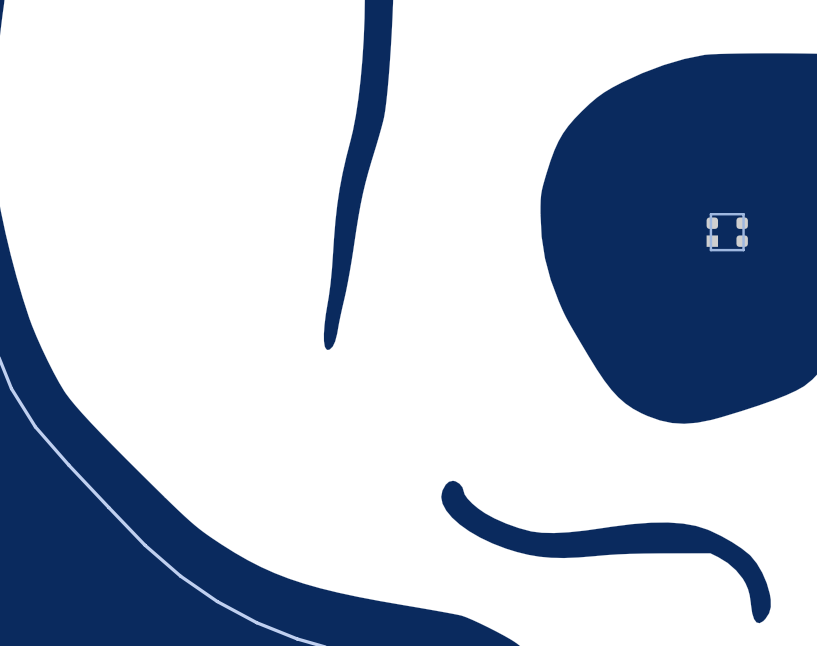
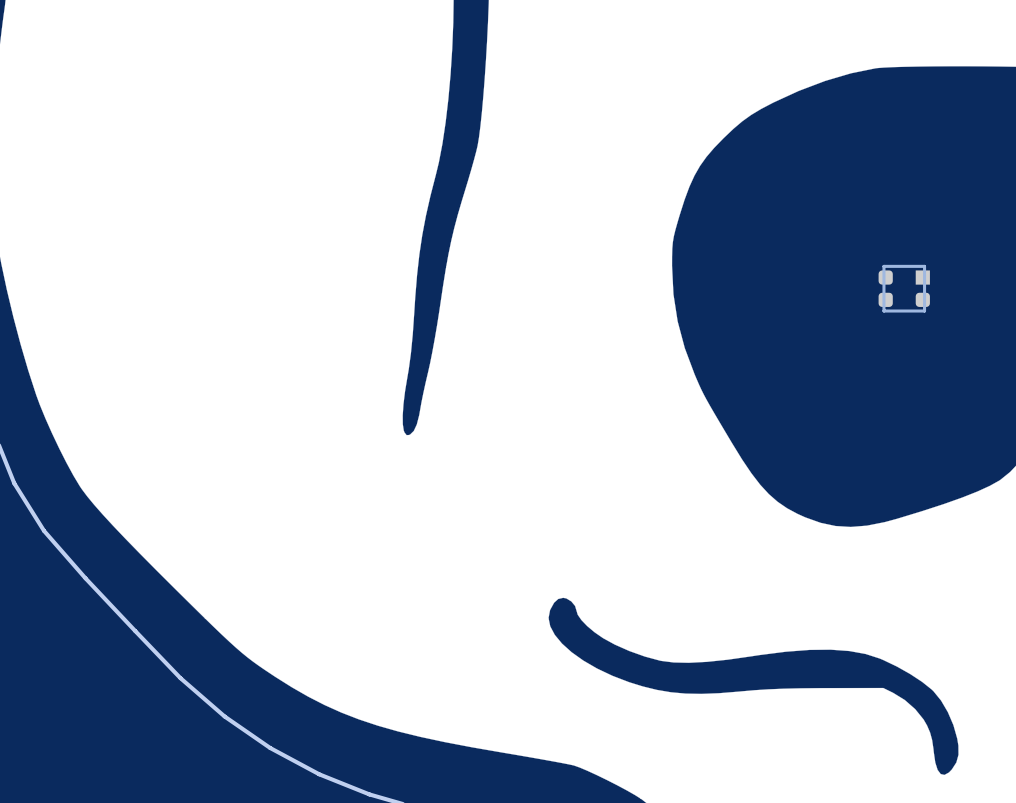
part rotation: 0° (727, 232) -> 180° (904, 288)

